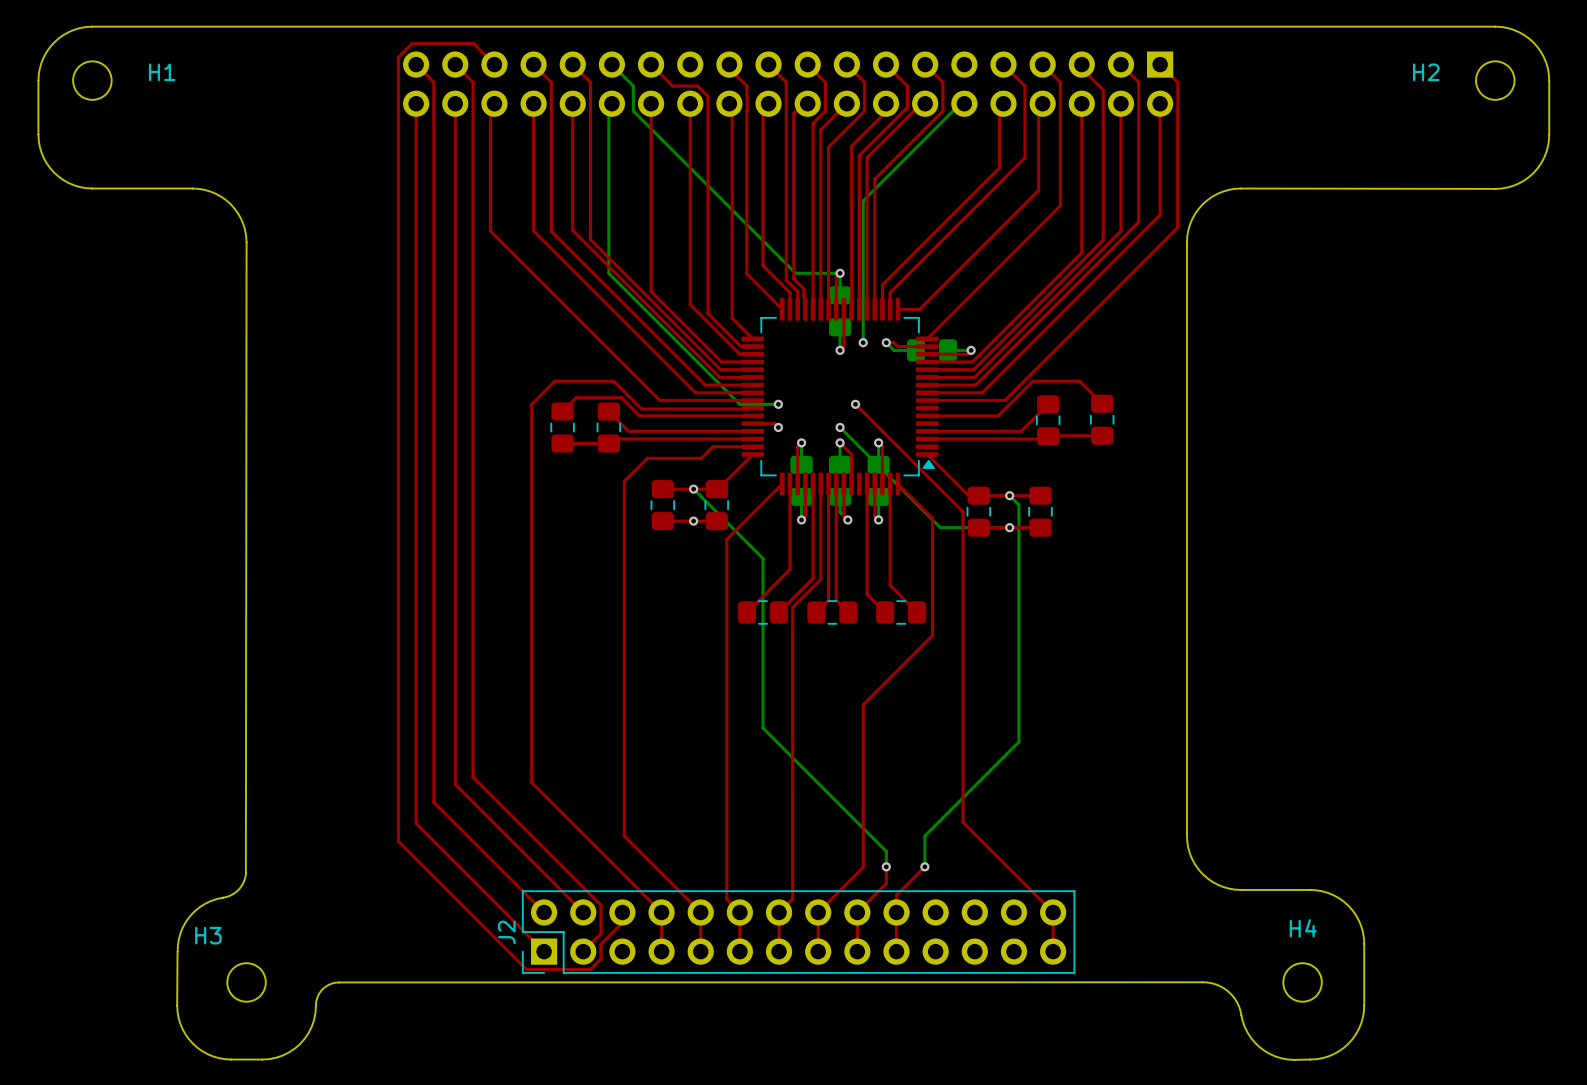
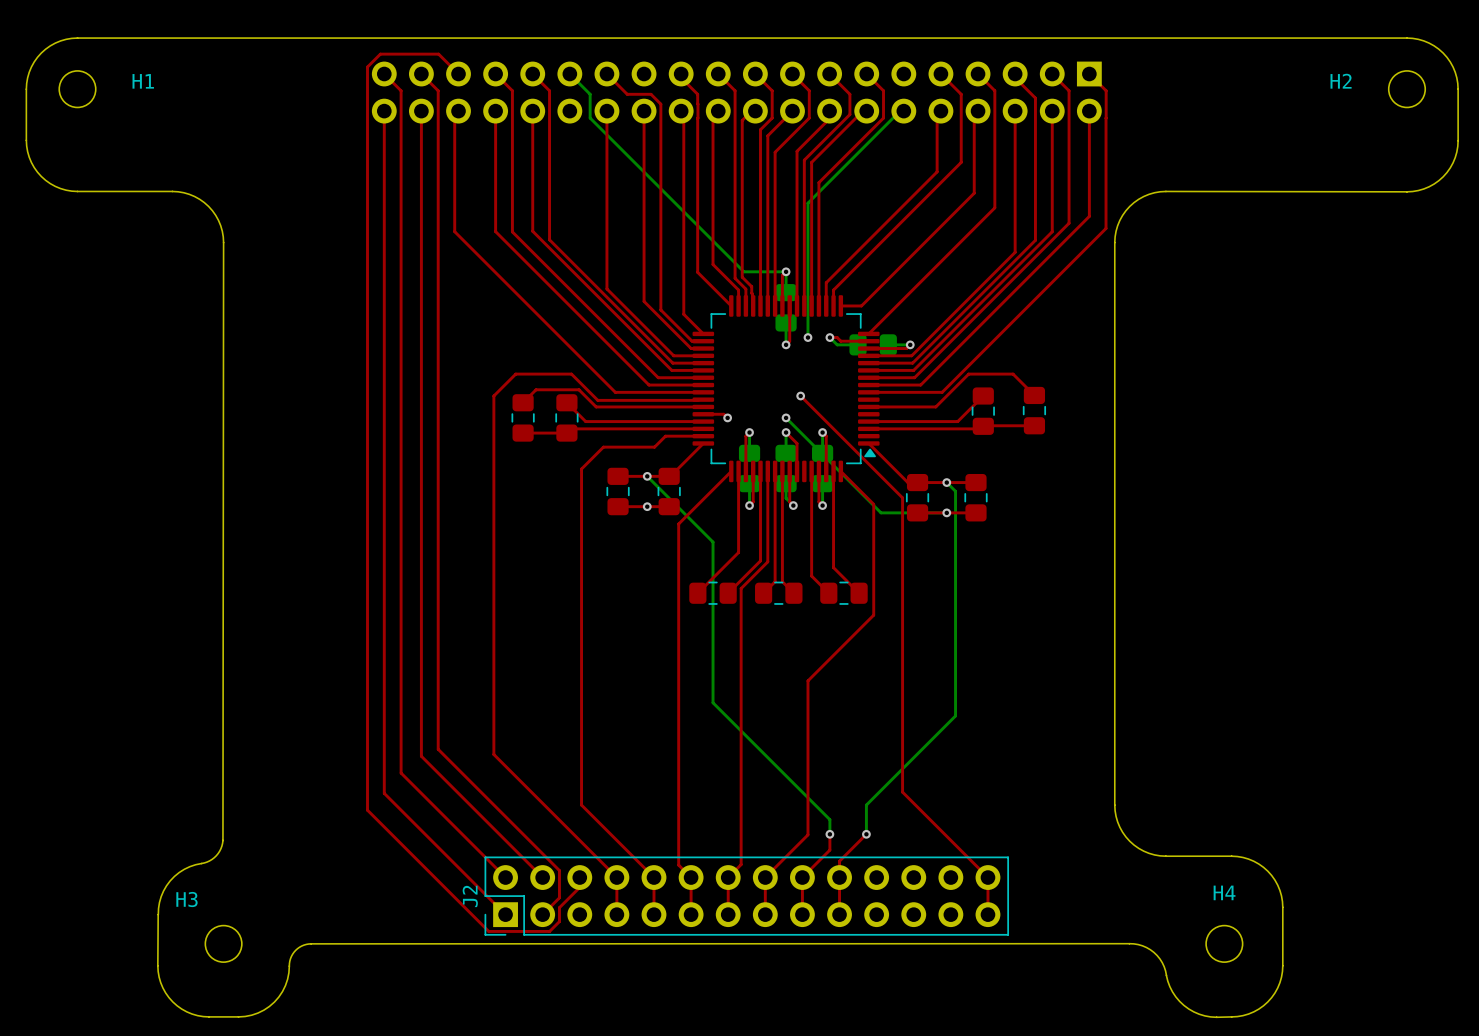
bottom track: (608, 104) (608, 273) (739, 404) (778, 404) -> none
via: (778, 404) -> none

